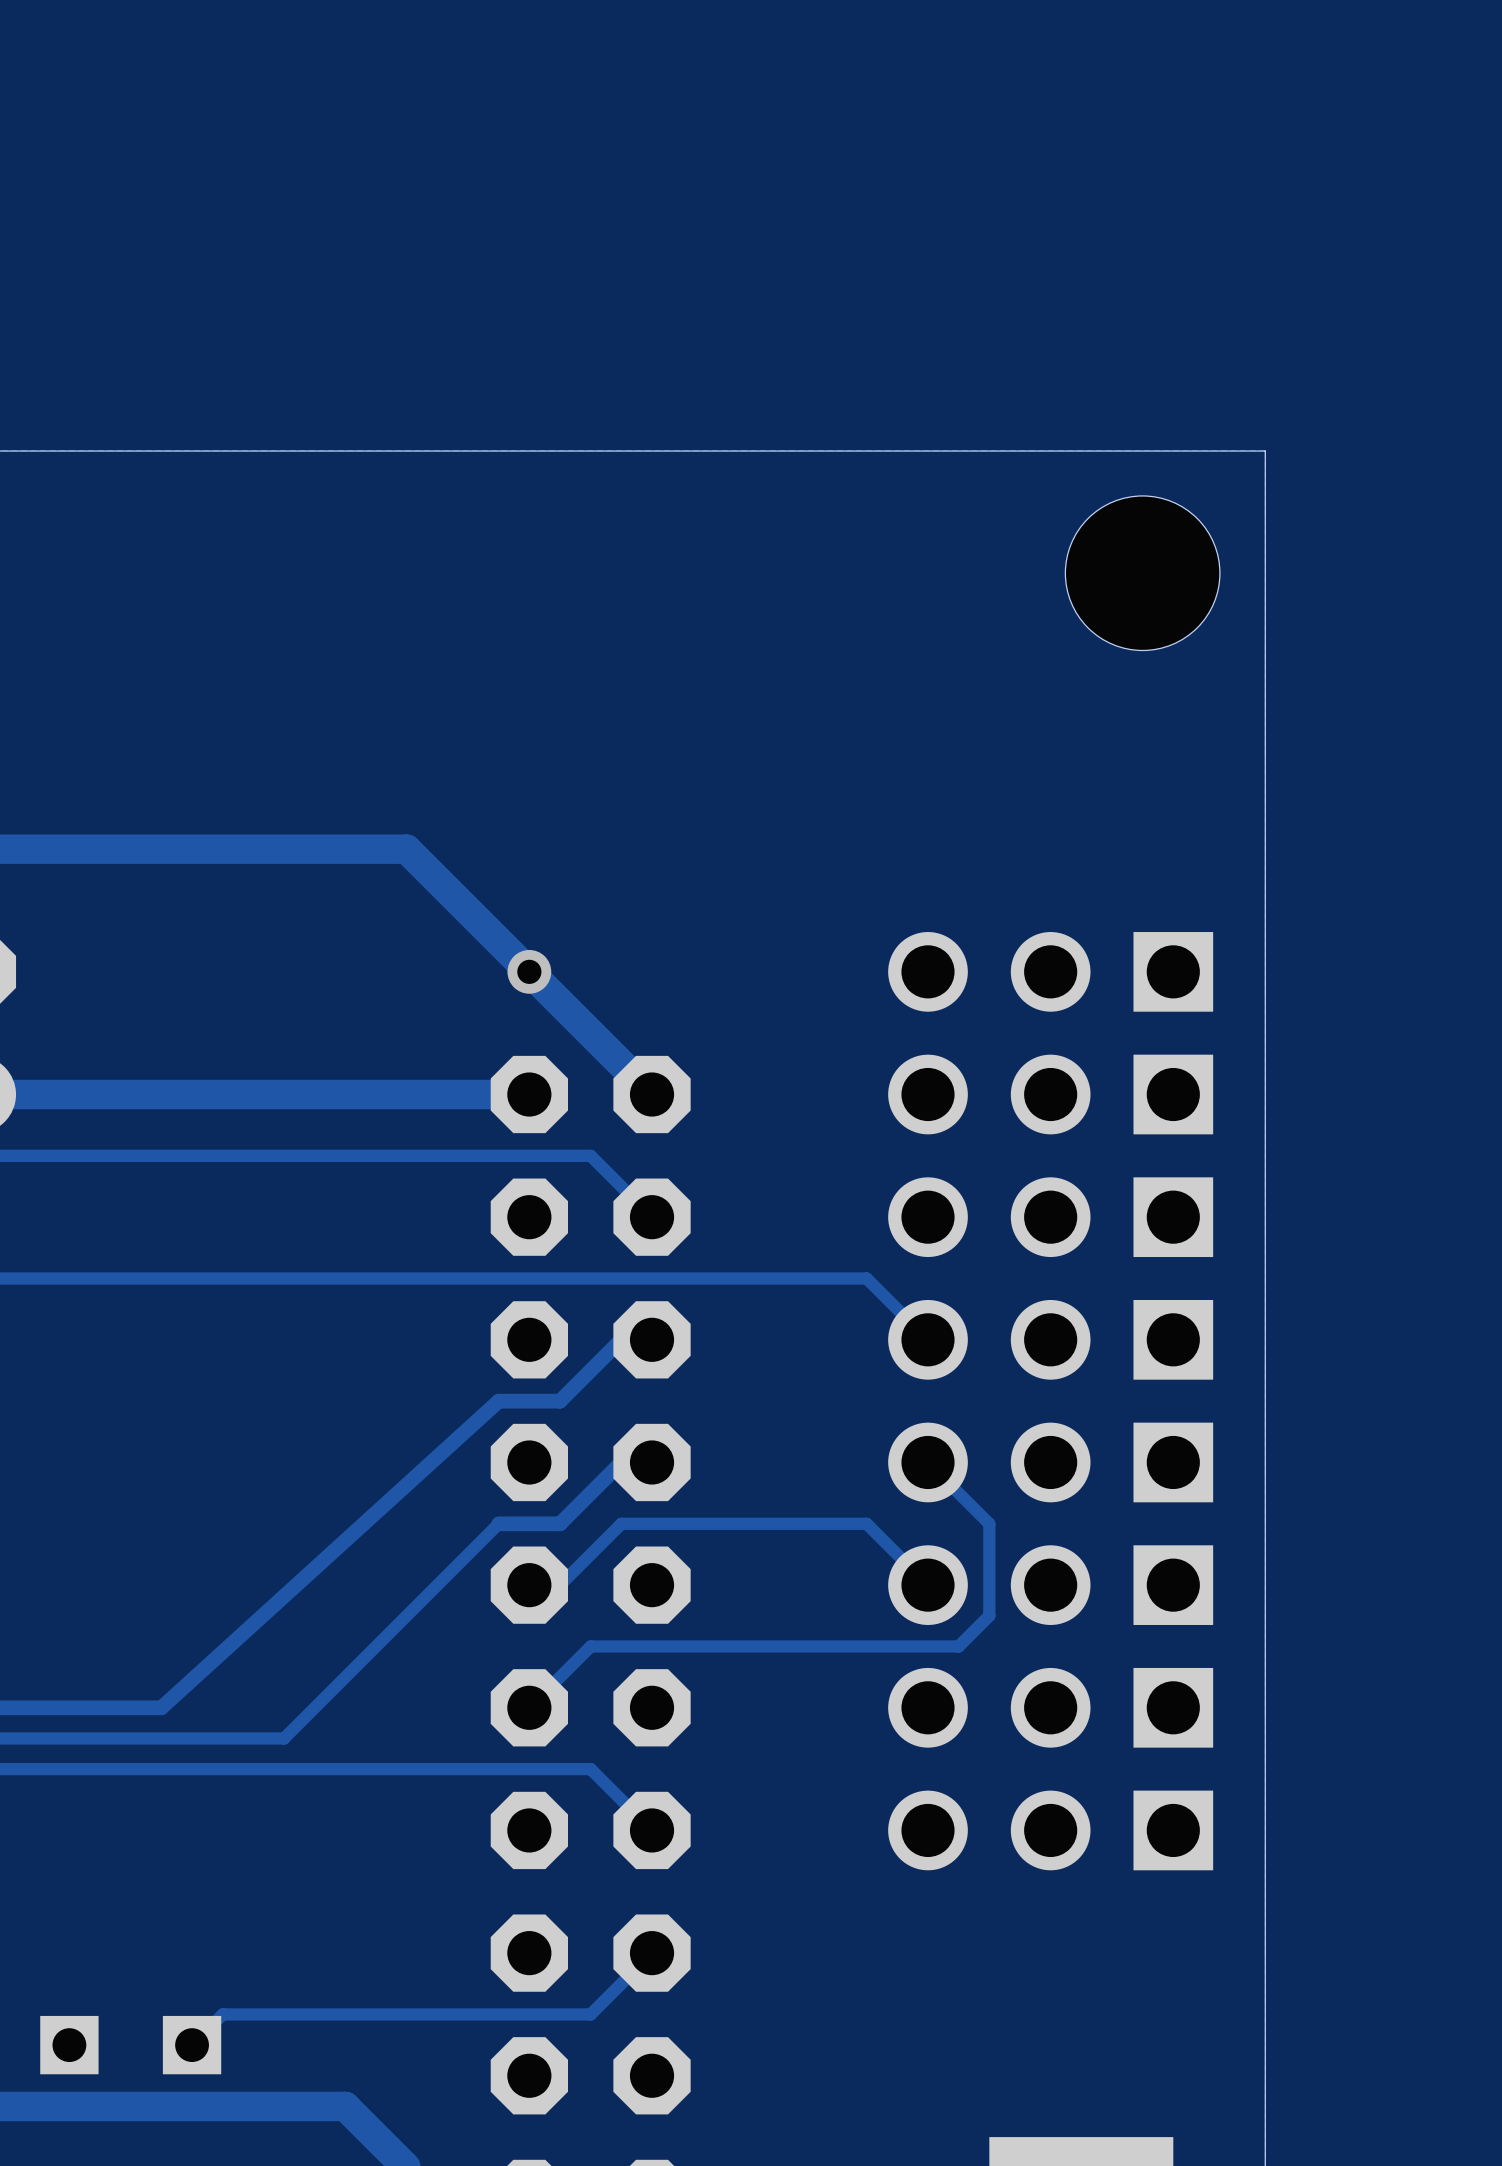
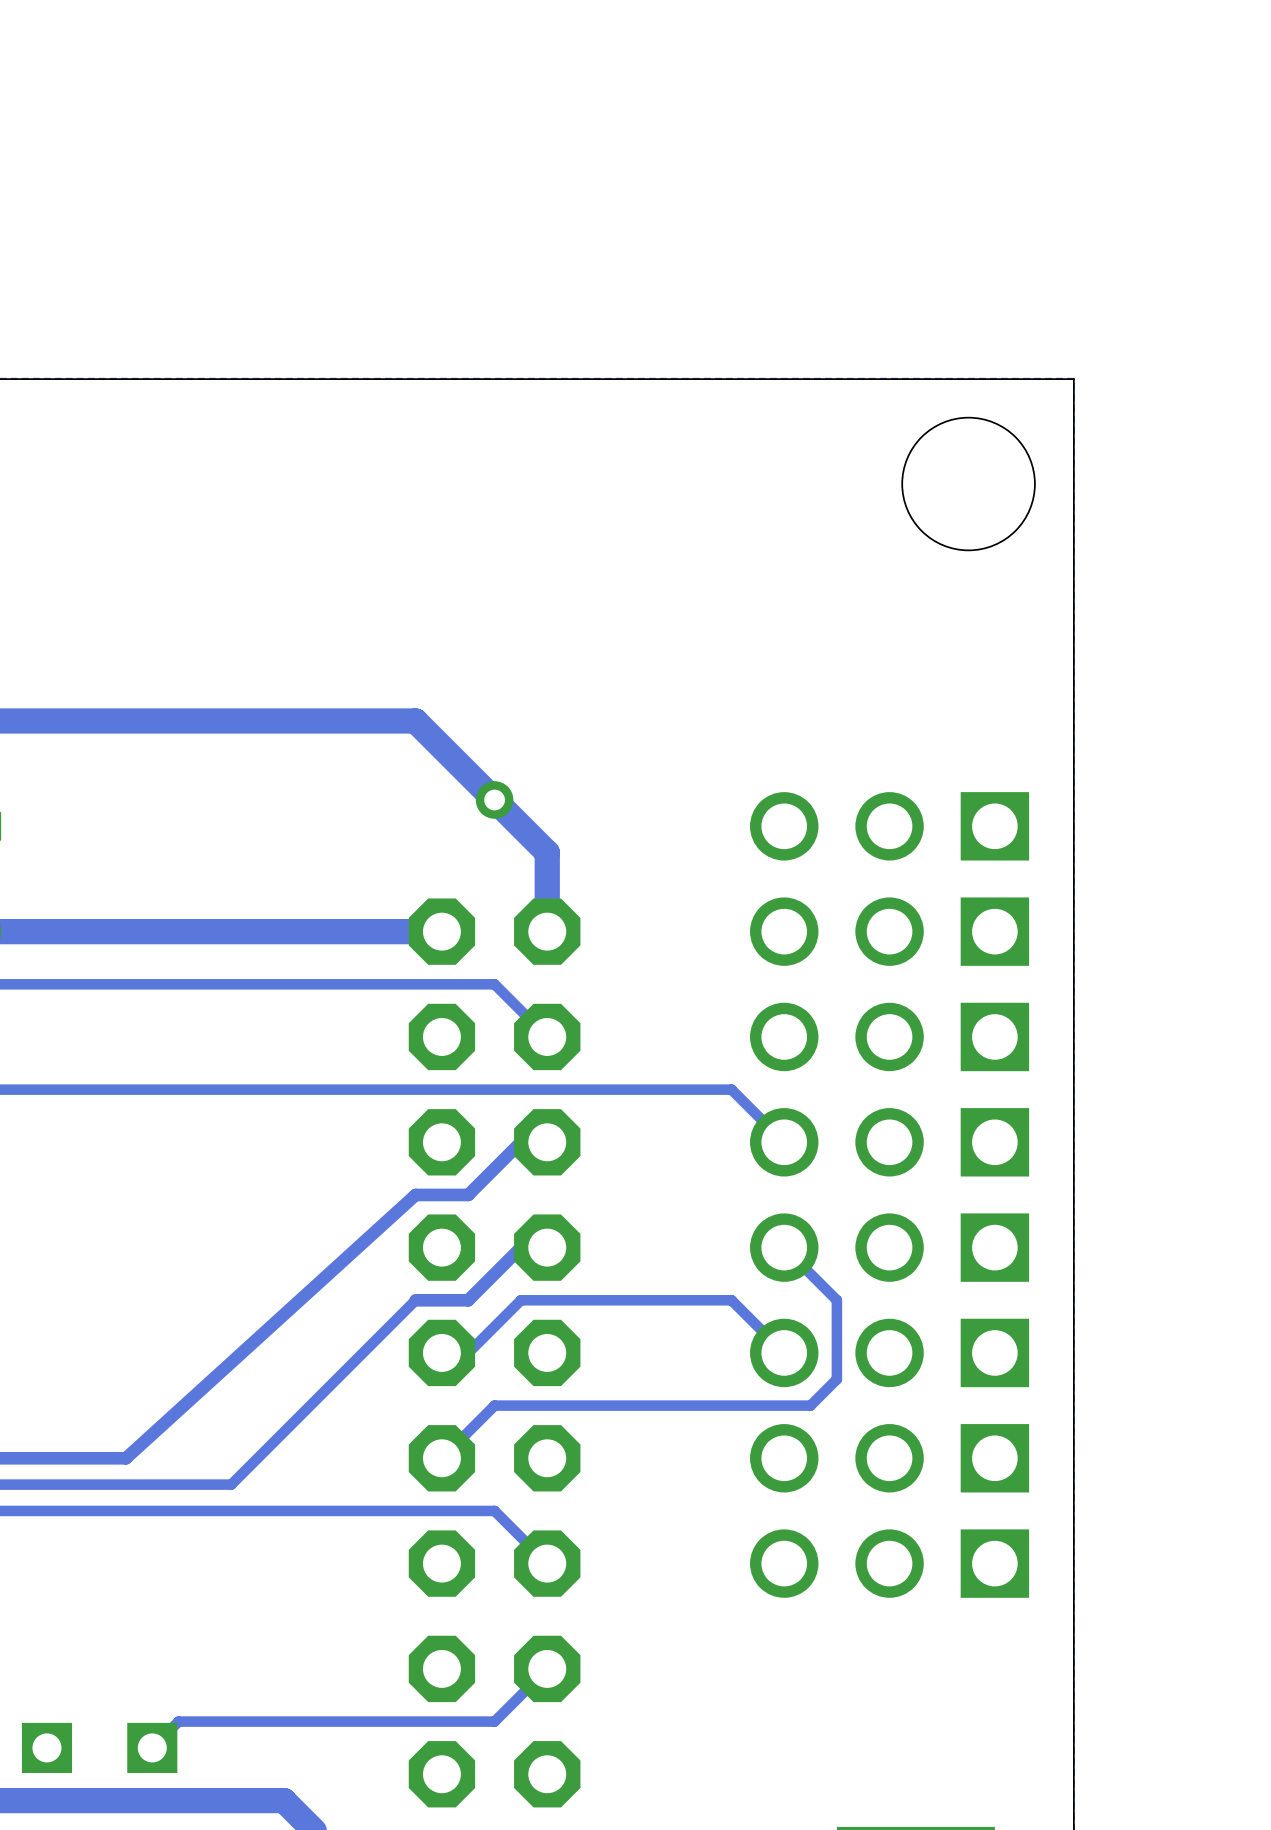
track: (406, 849) (652, 1094) -> (336, 721) (415, 721) (547, 852) (547, 931)
via position: (529, 971) -> (494, 799)

